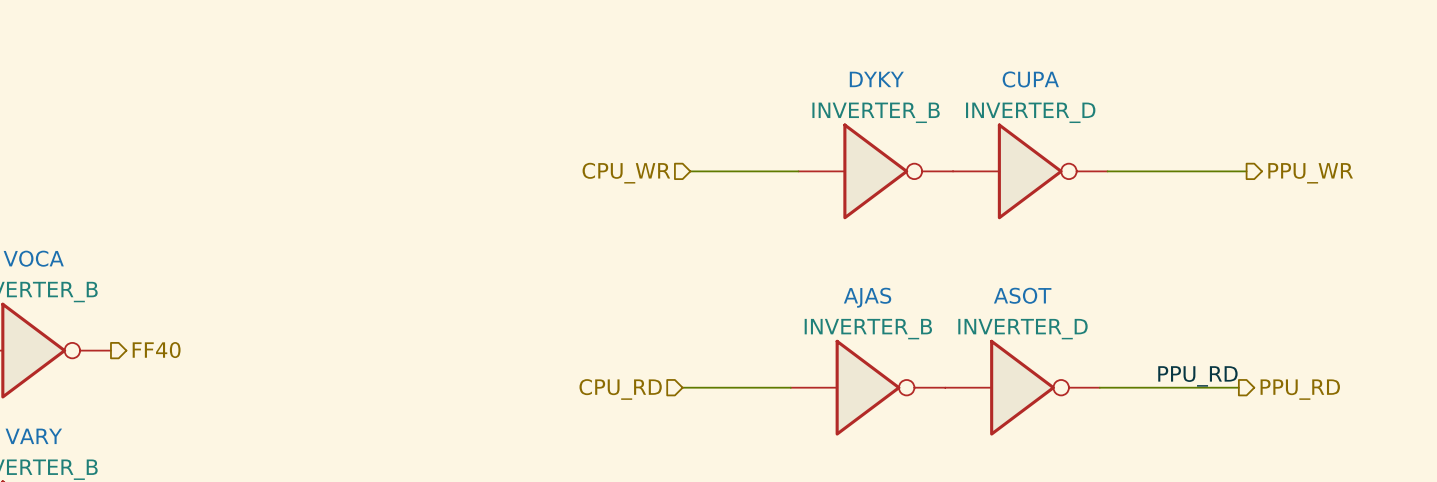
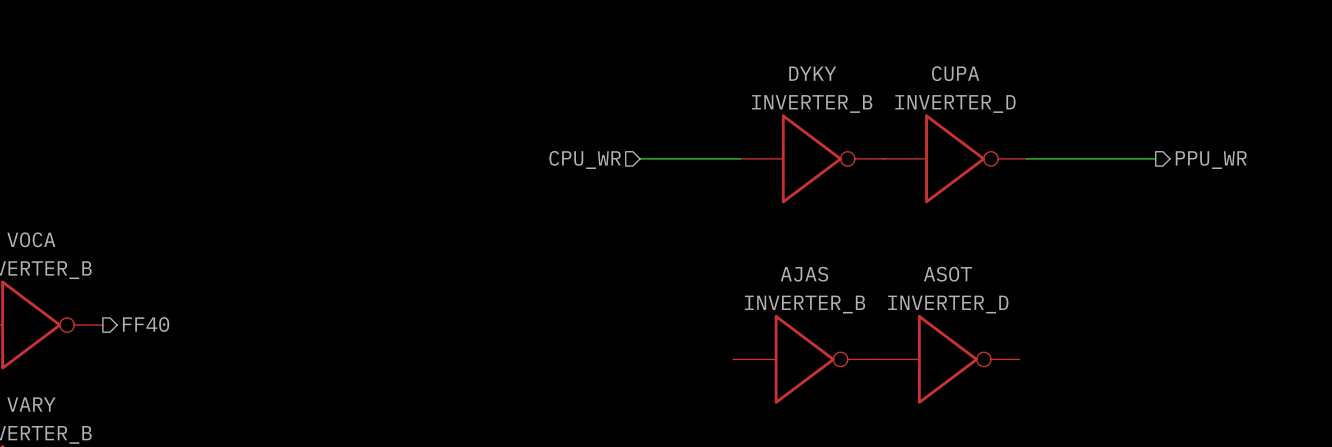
label: PPU_RD (1197, 376) -> none
wire: (682, 387) (790, 387) -> none
wire: (1099, 387) (1238, 387) -> none
hierarchical label: CPU_RD (620, 389) -> none
hierarchical label: PPU_RD (1300, 389) -> none

